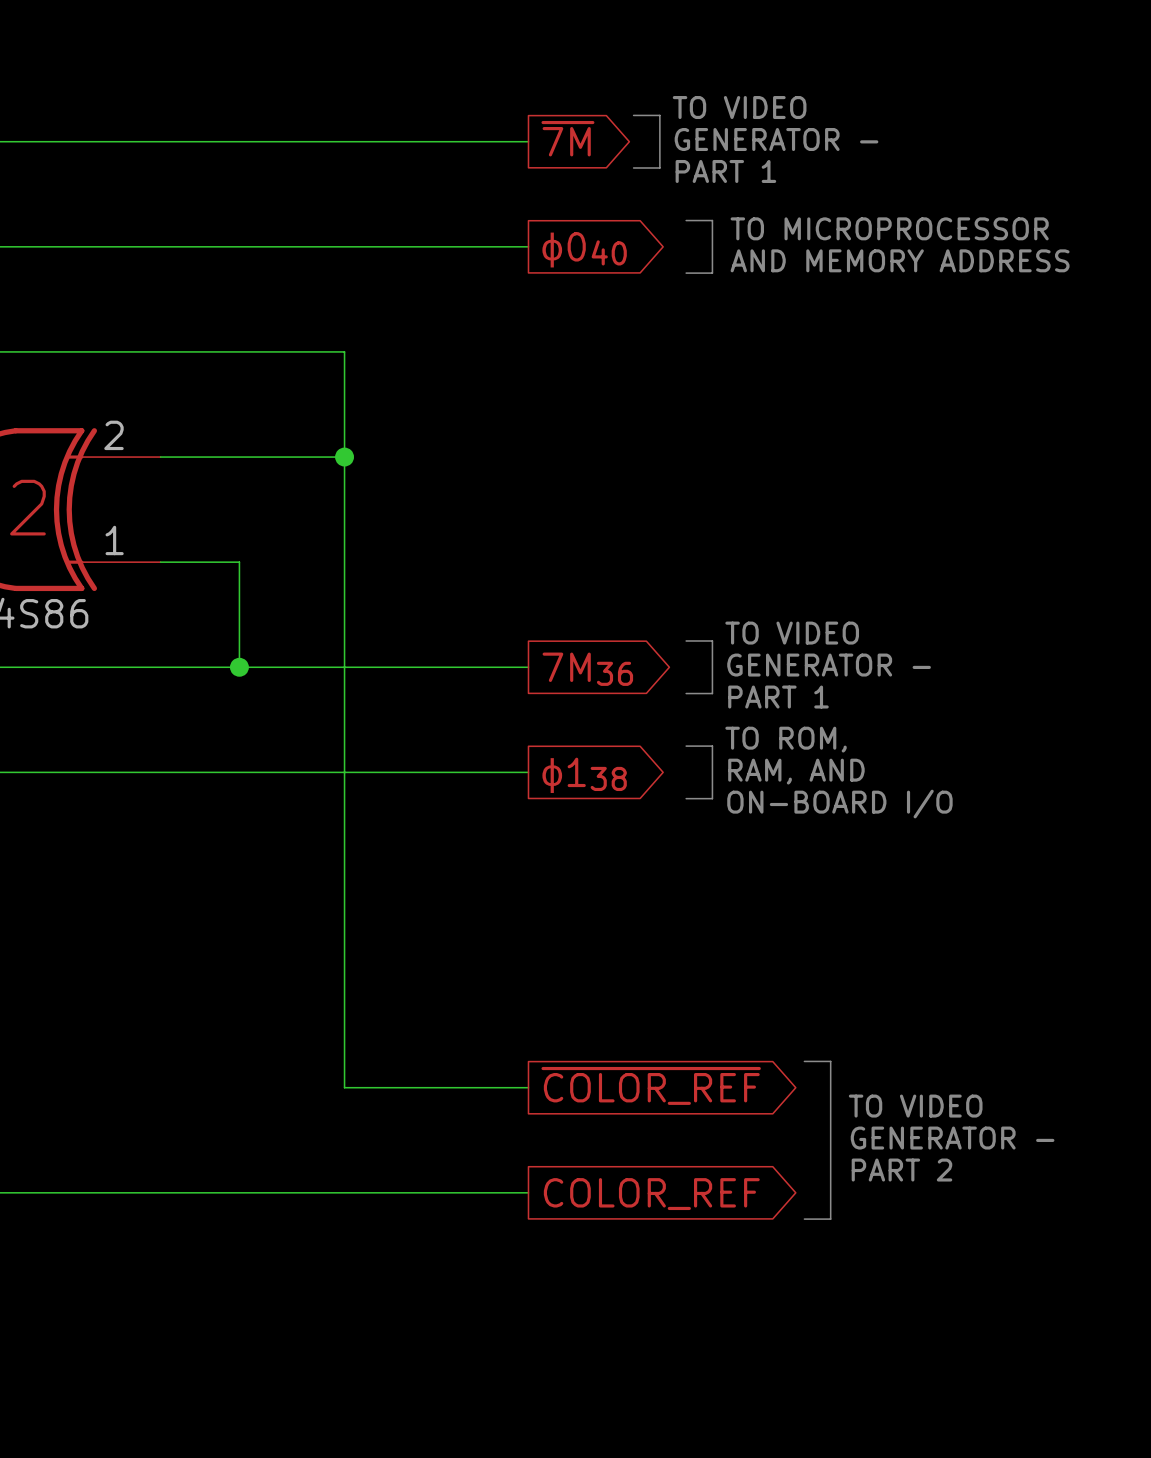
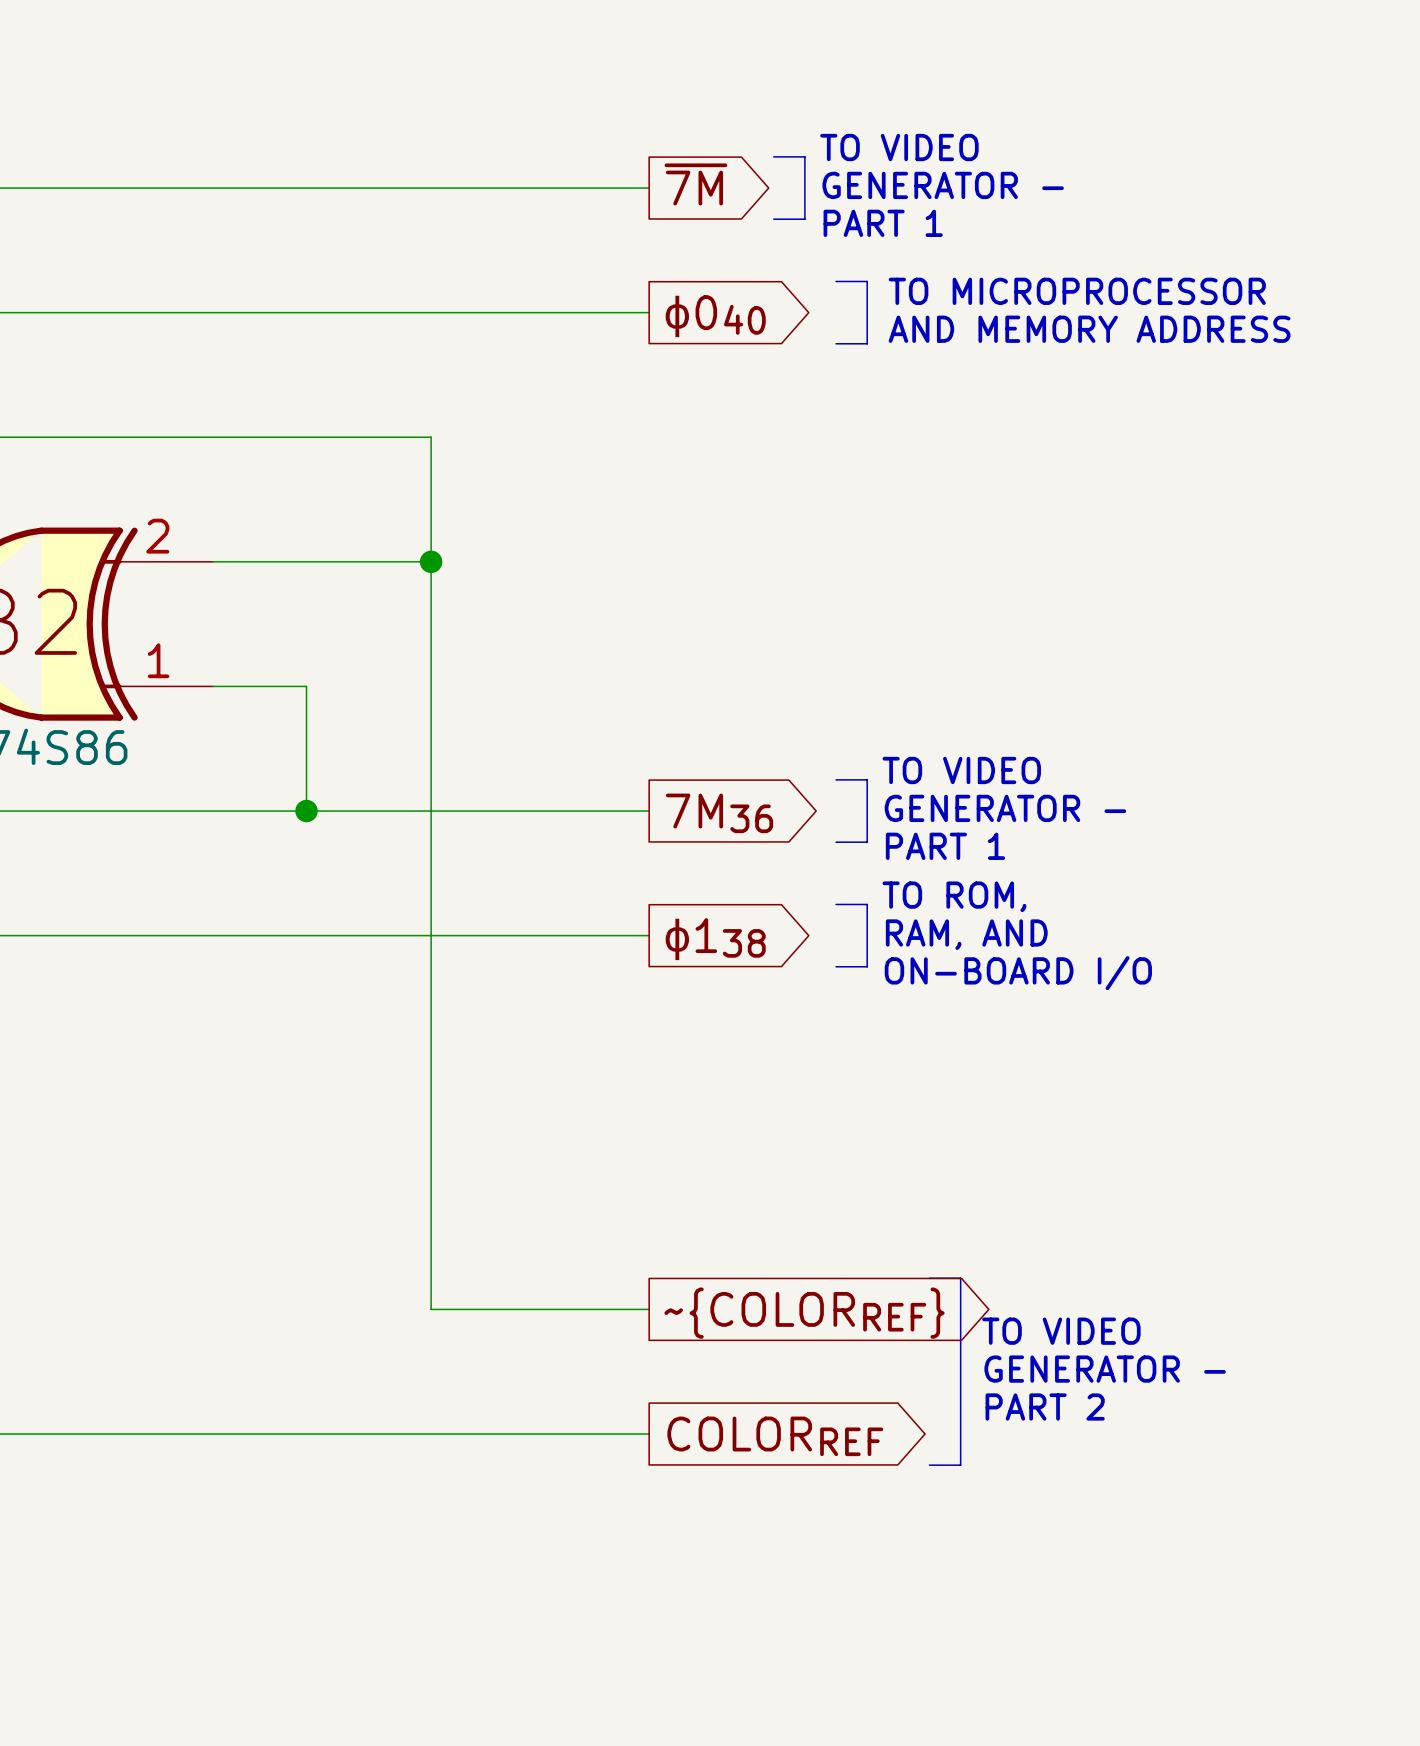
line: (804, 1061) (830, 1061) (830, 1219) (804, 1219) -> (929, 1278) (960, 1278) (960, 1465) (929, 1465)
global label: ~{COLOR_REF} (651, 1085) -> ~{COLORREF} (804, 1313)
text position: TO VIDEO (915, 1106) -> TO VIDEO (1061, 1331)
text position: GENERATOR - (952, 1138) -> GENERATOR - (1105, 1369)
text position: PART 2 (901, 1170) -> PART 2 (1045, 1406)
global label: COLOR_REF (651, 1194) -> COLORREF (775, 1436)

